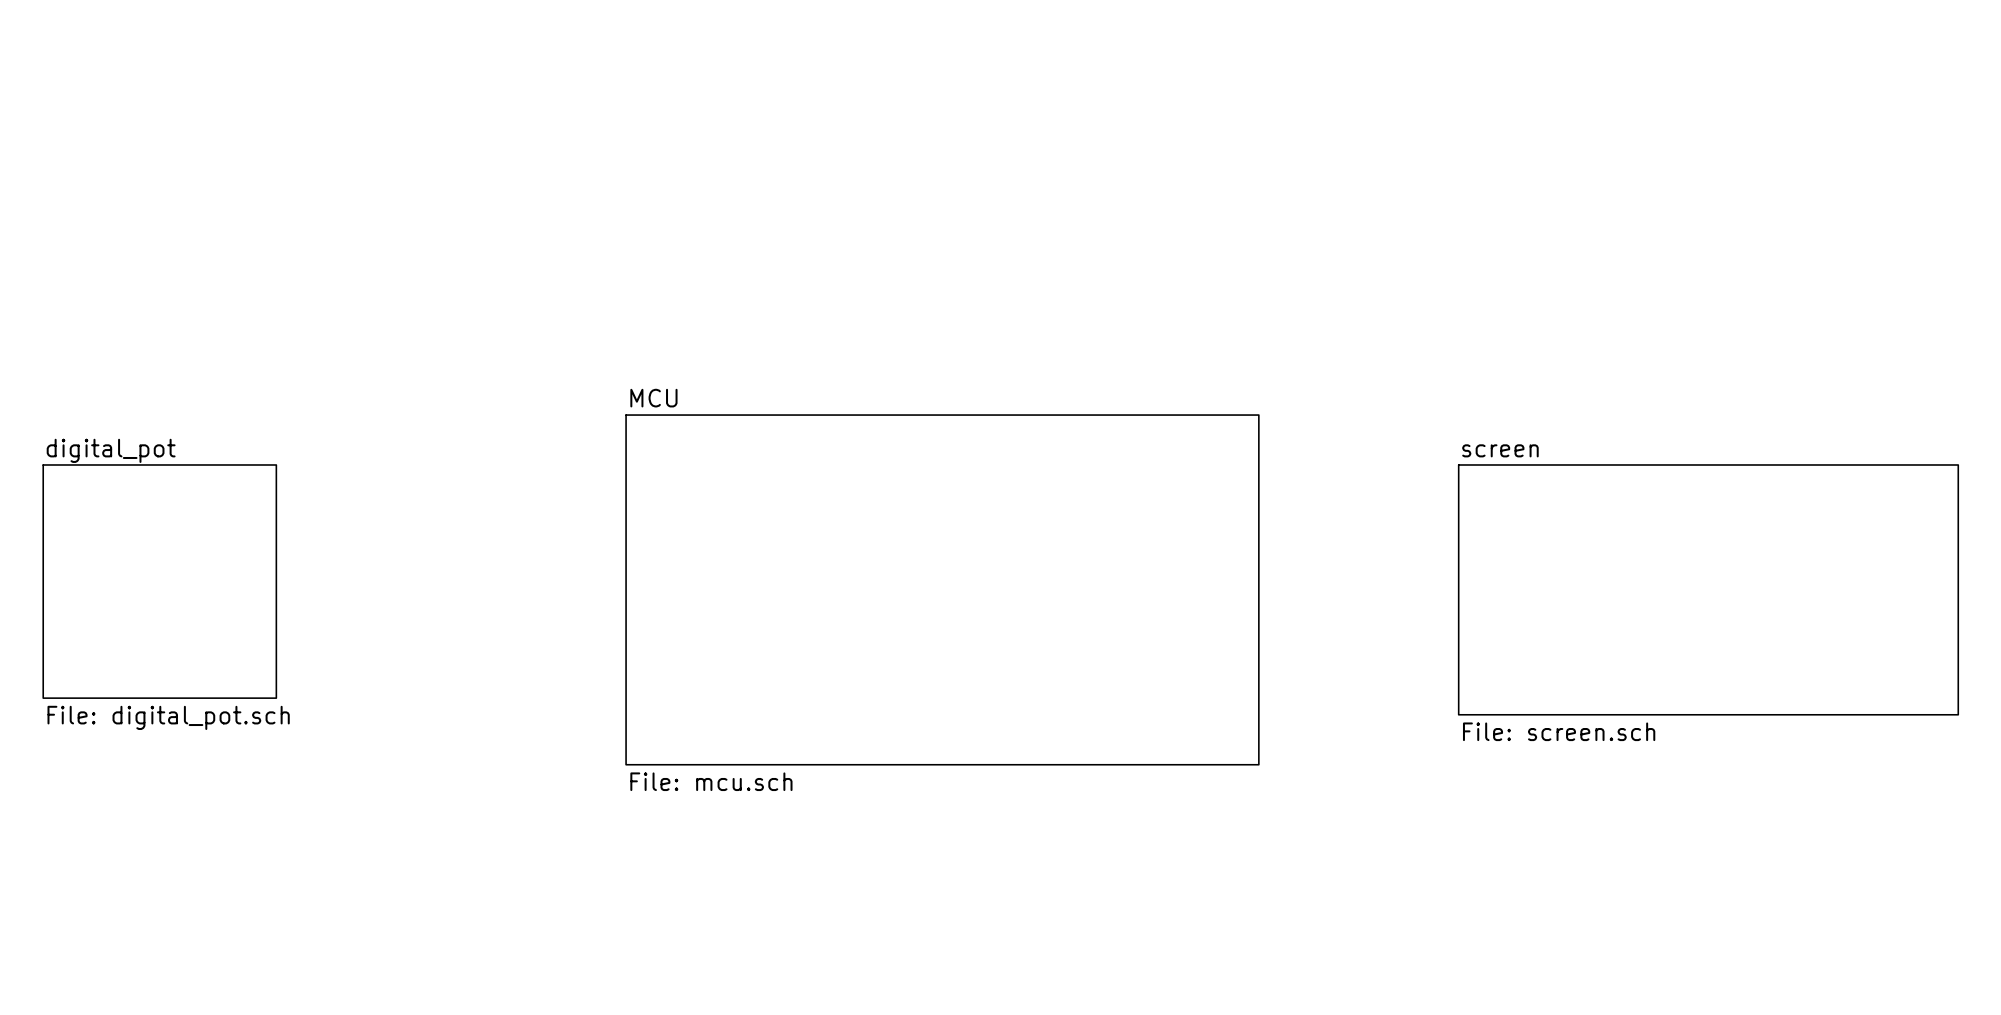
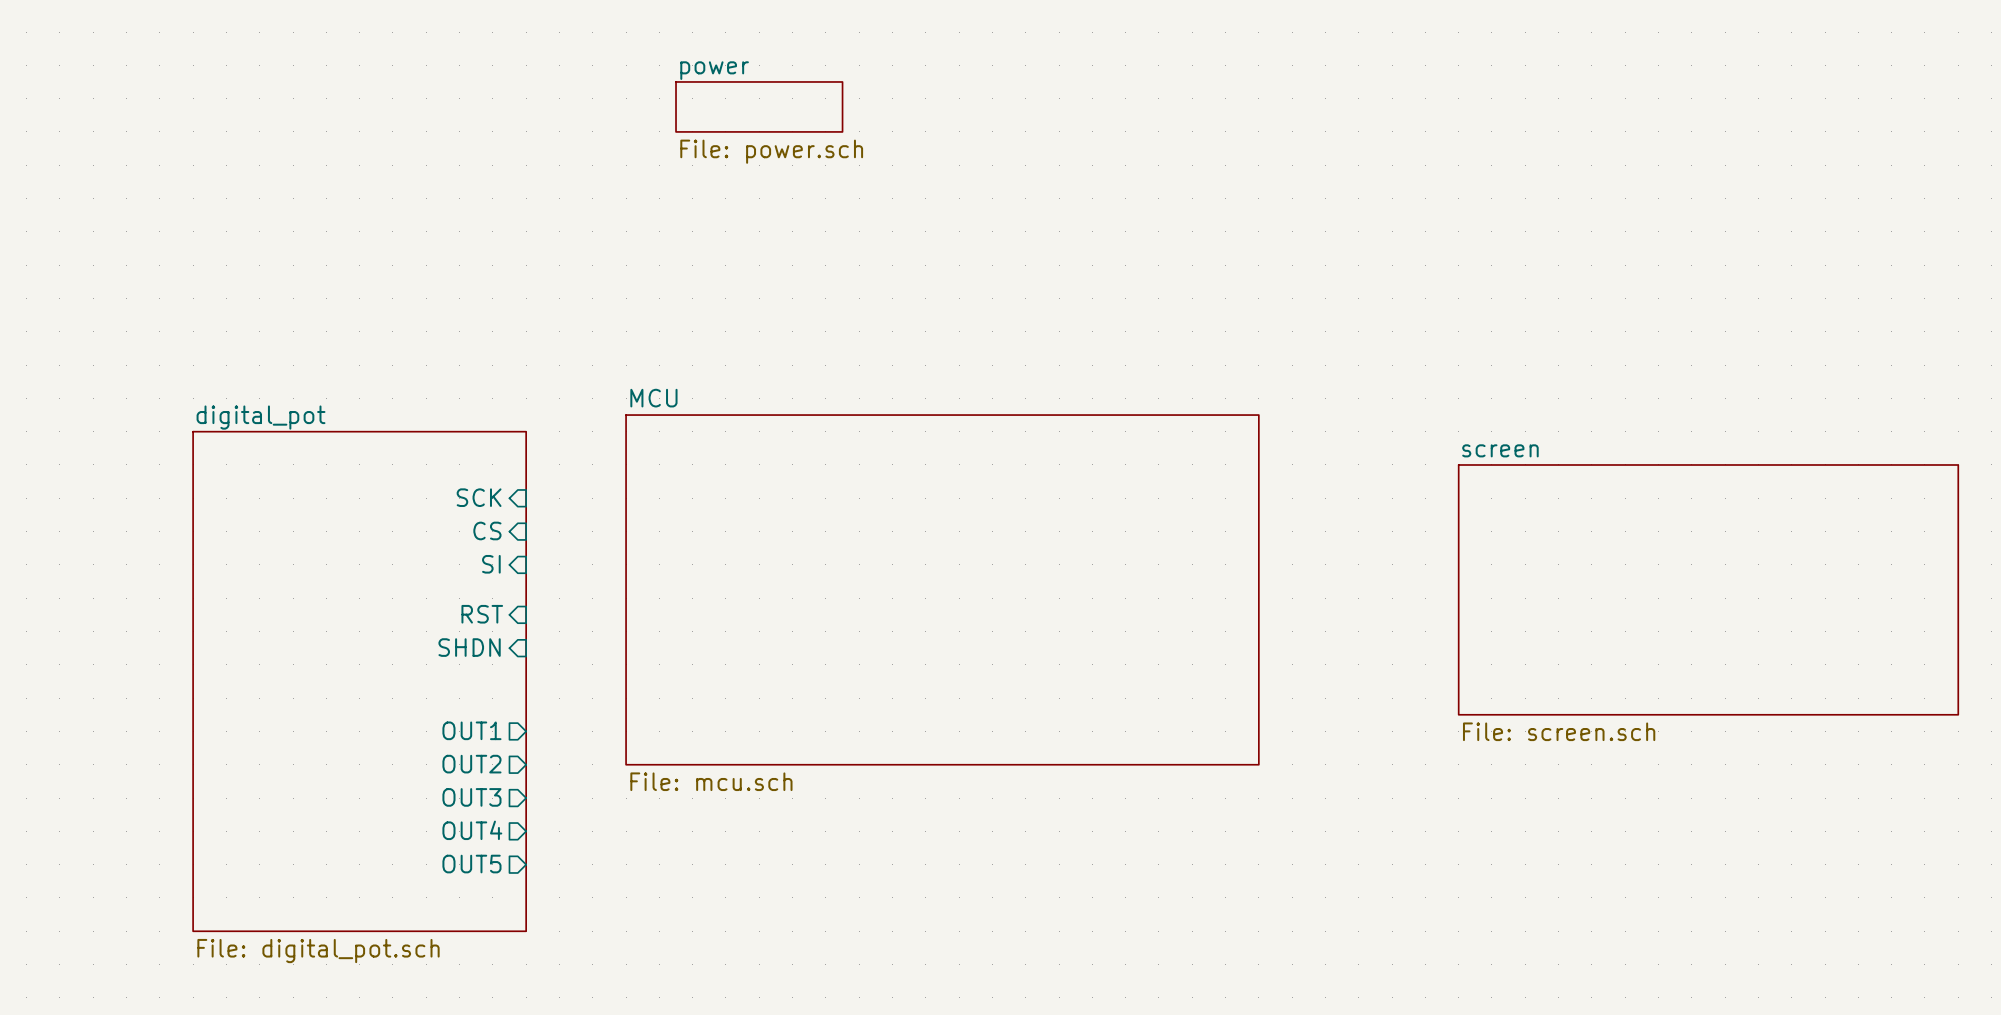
sheet power: none -> File: power.sch (759, 106)
sheet pin: none -> SCK (479, 497)
sheet pin: none -> CS (487, 530)
sheet pin: none -> SI (491, 564)
sheet digital_pot: File: digital_pot.sch (159, 581) -> none
sheet pin: none -> RST (482, 614)
sheet pin: none -> SHDN (469, 647)
sheet digital_pot: none -> File: digital_pot.sch (359, 681)
sheet pin: none -> OUT1 (471, 730)
sheet pin: none -> OUT2 (471, 764)
sheet pin: none -> OUT3 (471, 797)
sheet pin: none -> OUT4 (472, 830)
sheet pin: none -> OUT5 (471, 864)

